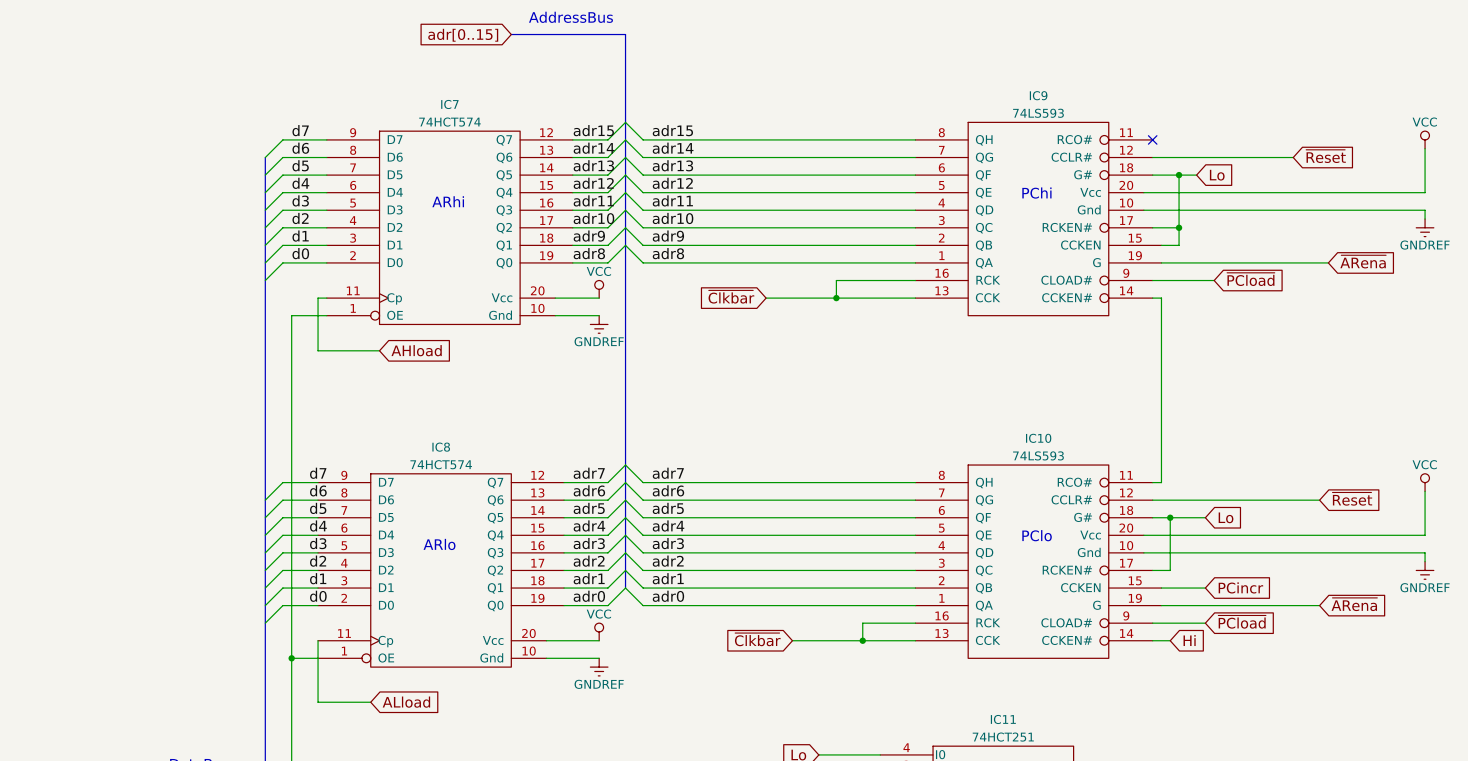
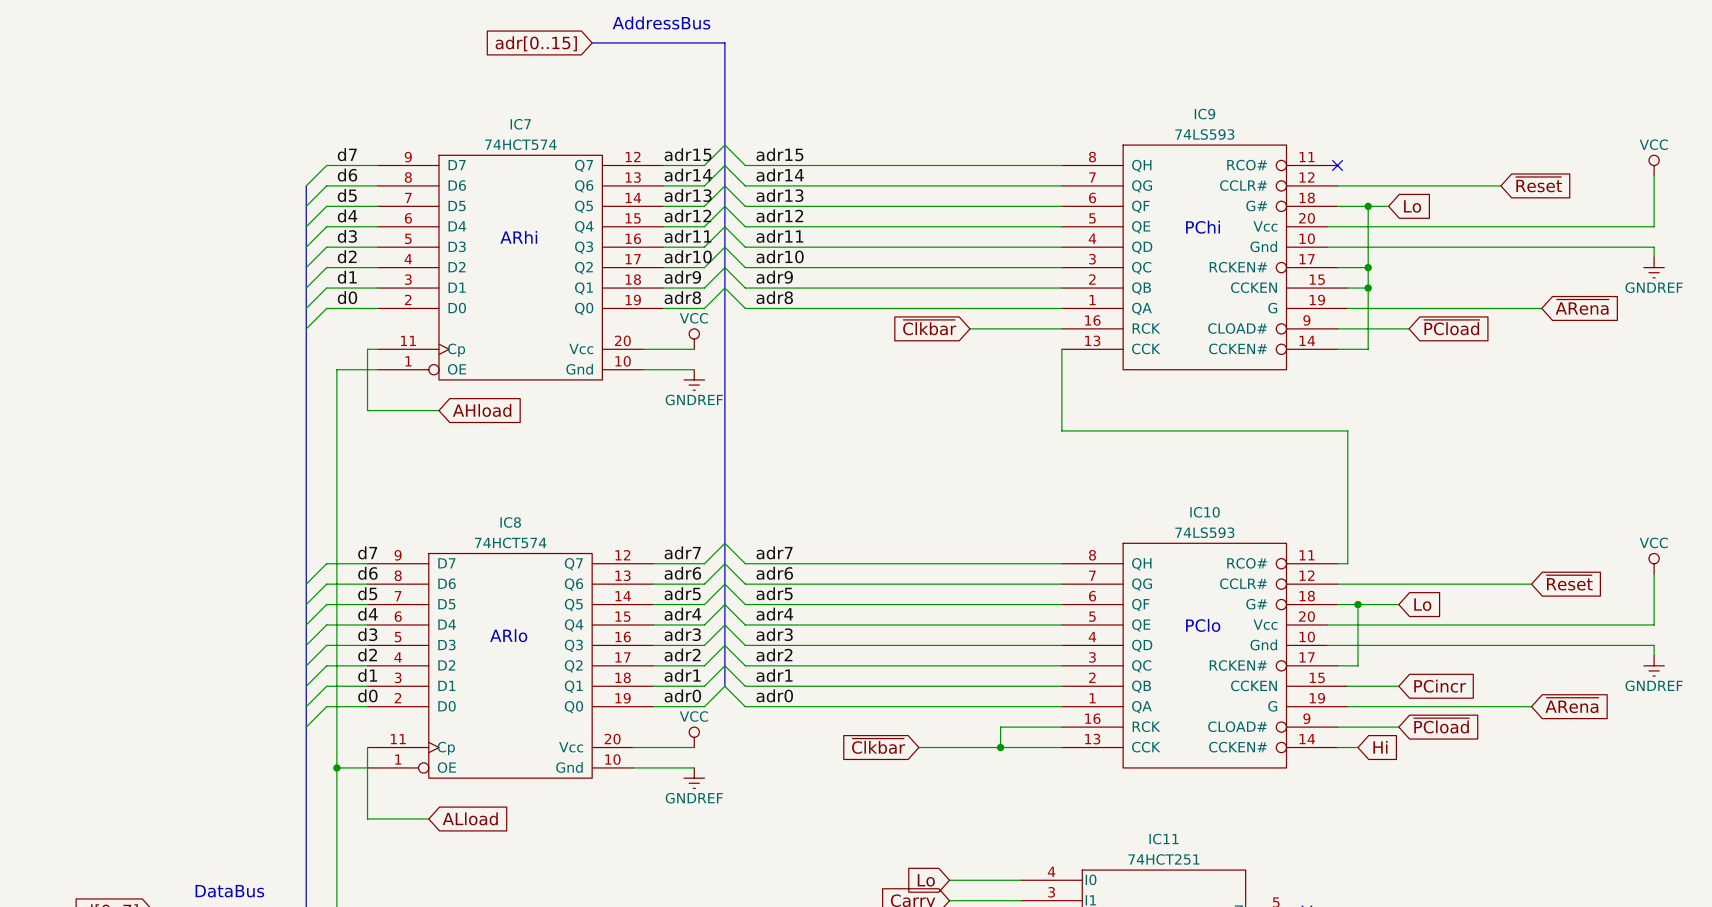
junction: none -> (1368, 288)
wire: (836, 280) (836, 298) -> none
global label position: ~{Clkbar} (731, 296) -> ~{Clkbar} (929, 327)
wire: (766, 298) (915, 298) -> (1347, 430) (1061, 430) (1061, 349)
junction: (836, 298) -> none
wire: (1161, 298) (1161, 368) -> (1347, 349) (1368, 349) (1368, 288)

